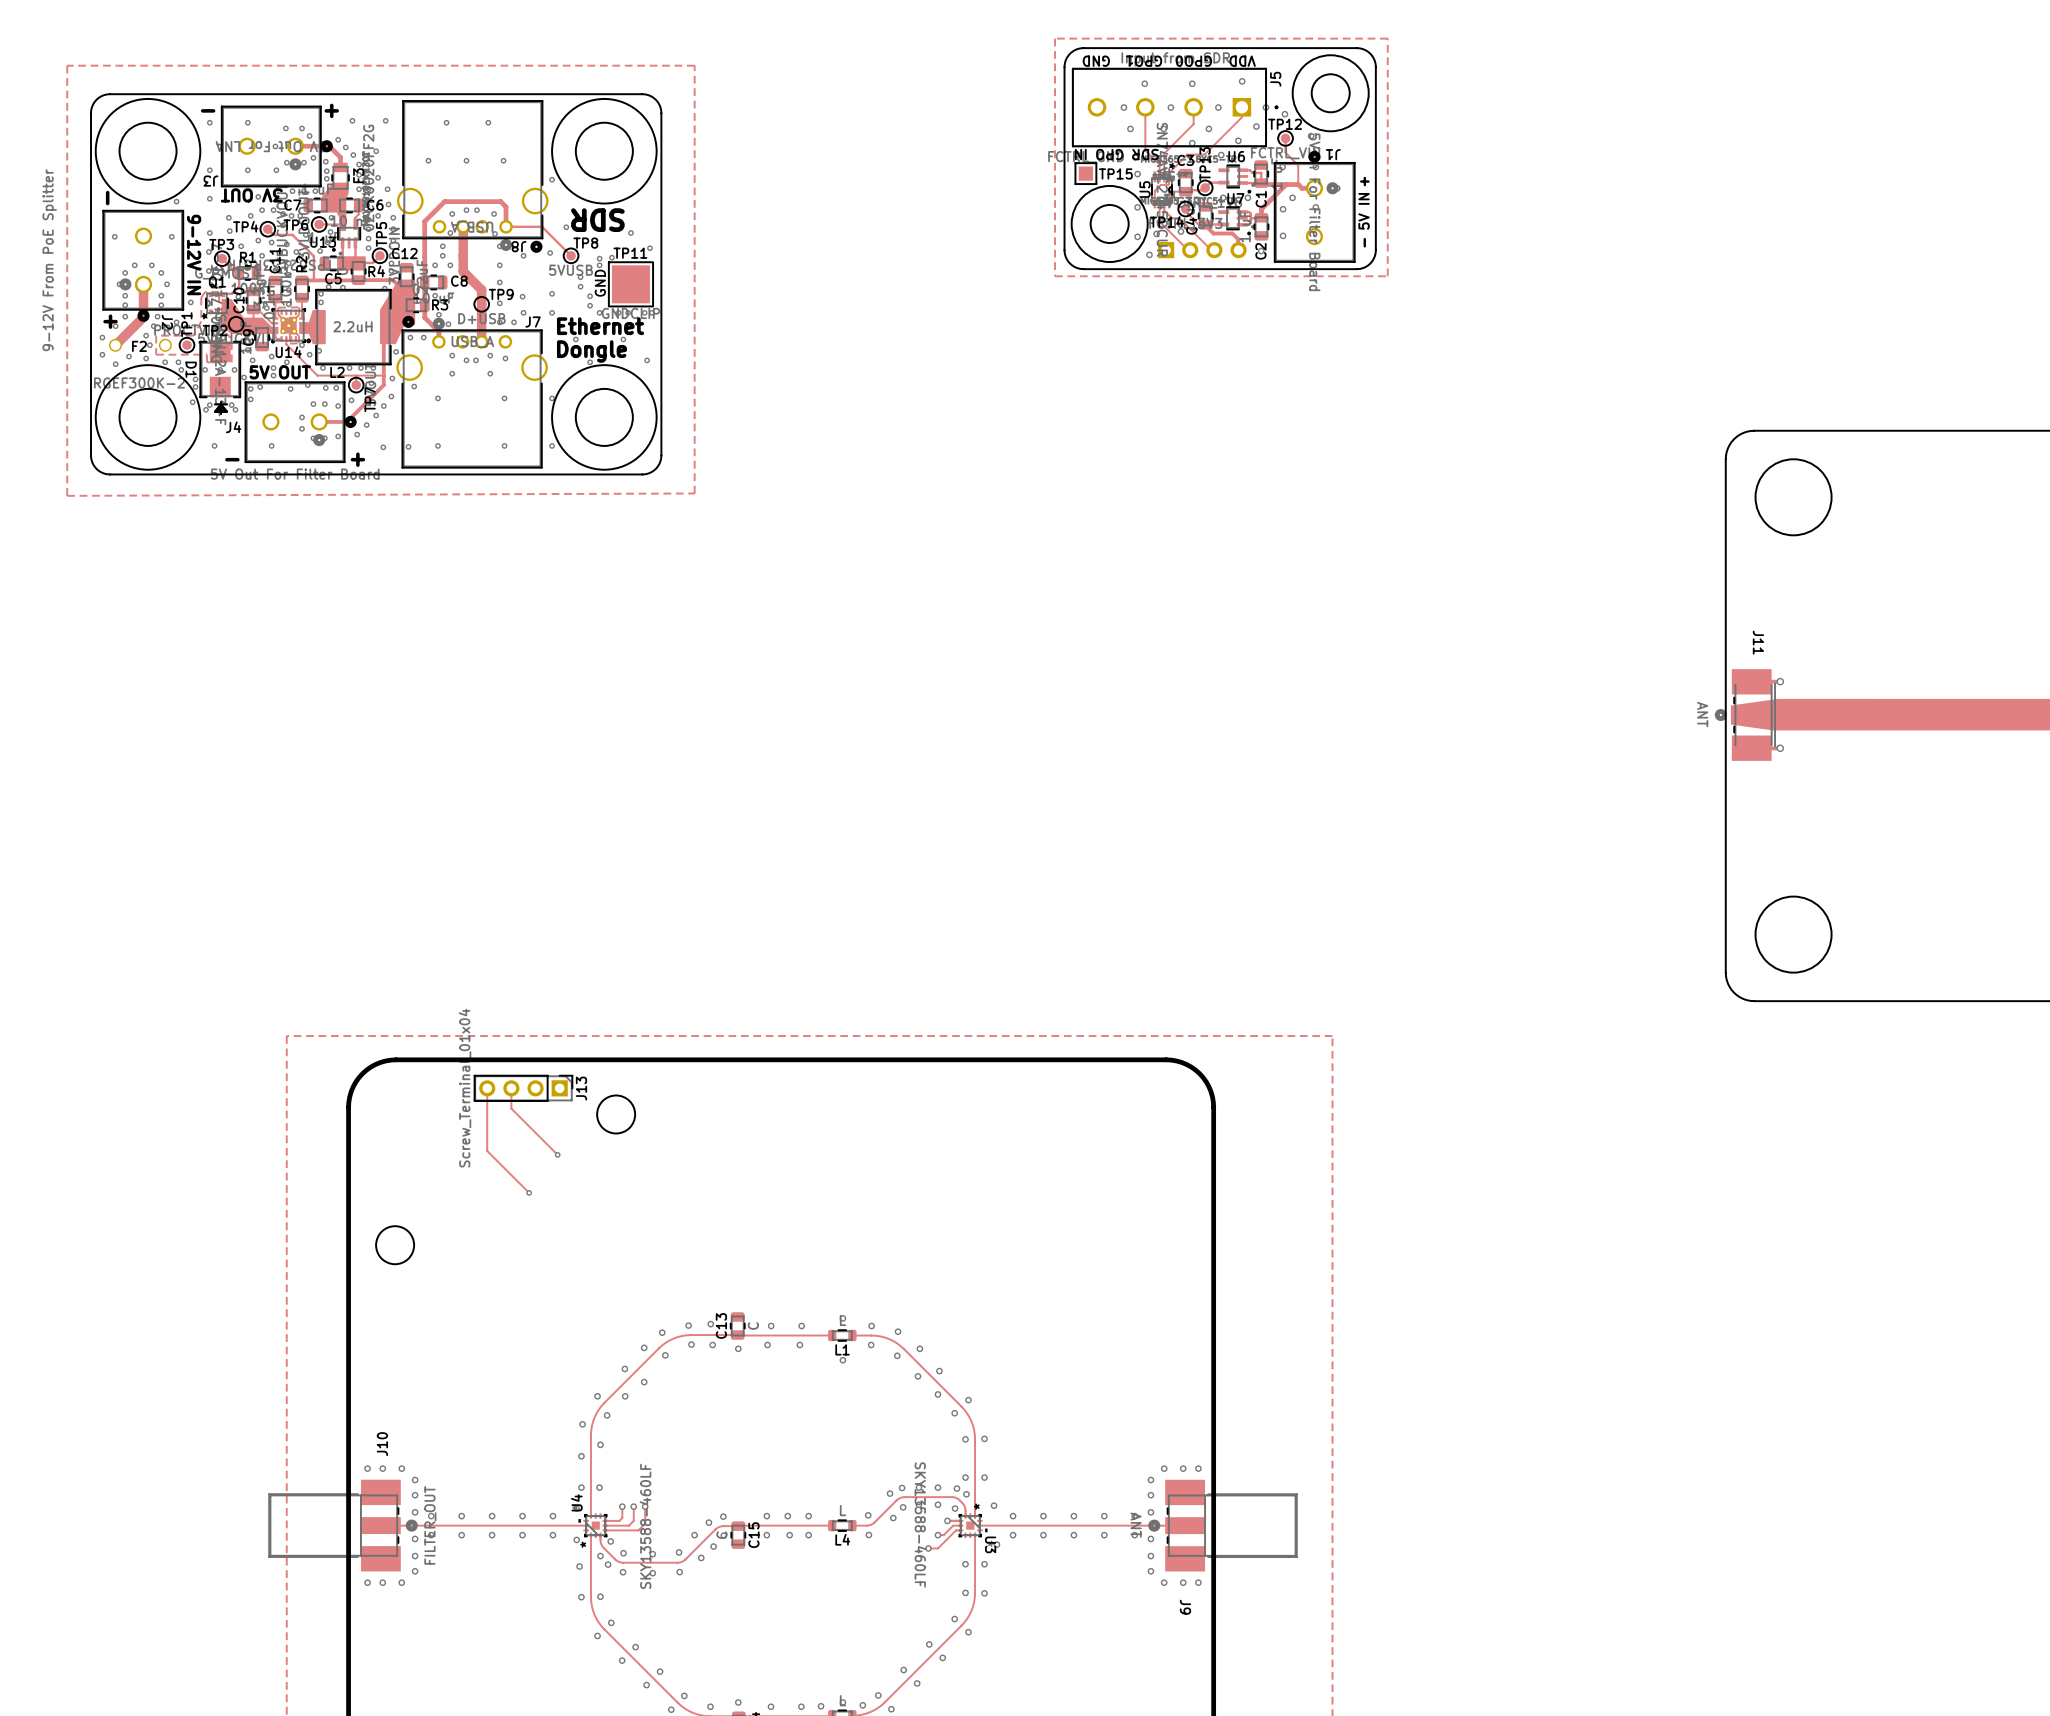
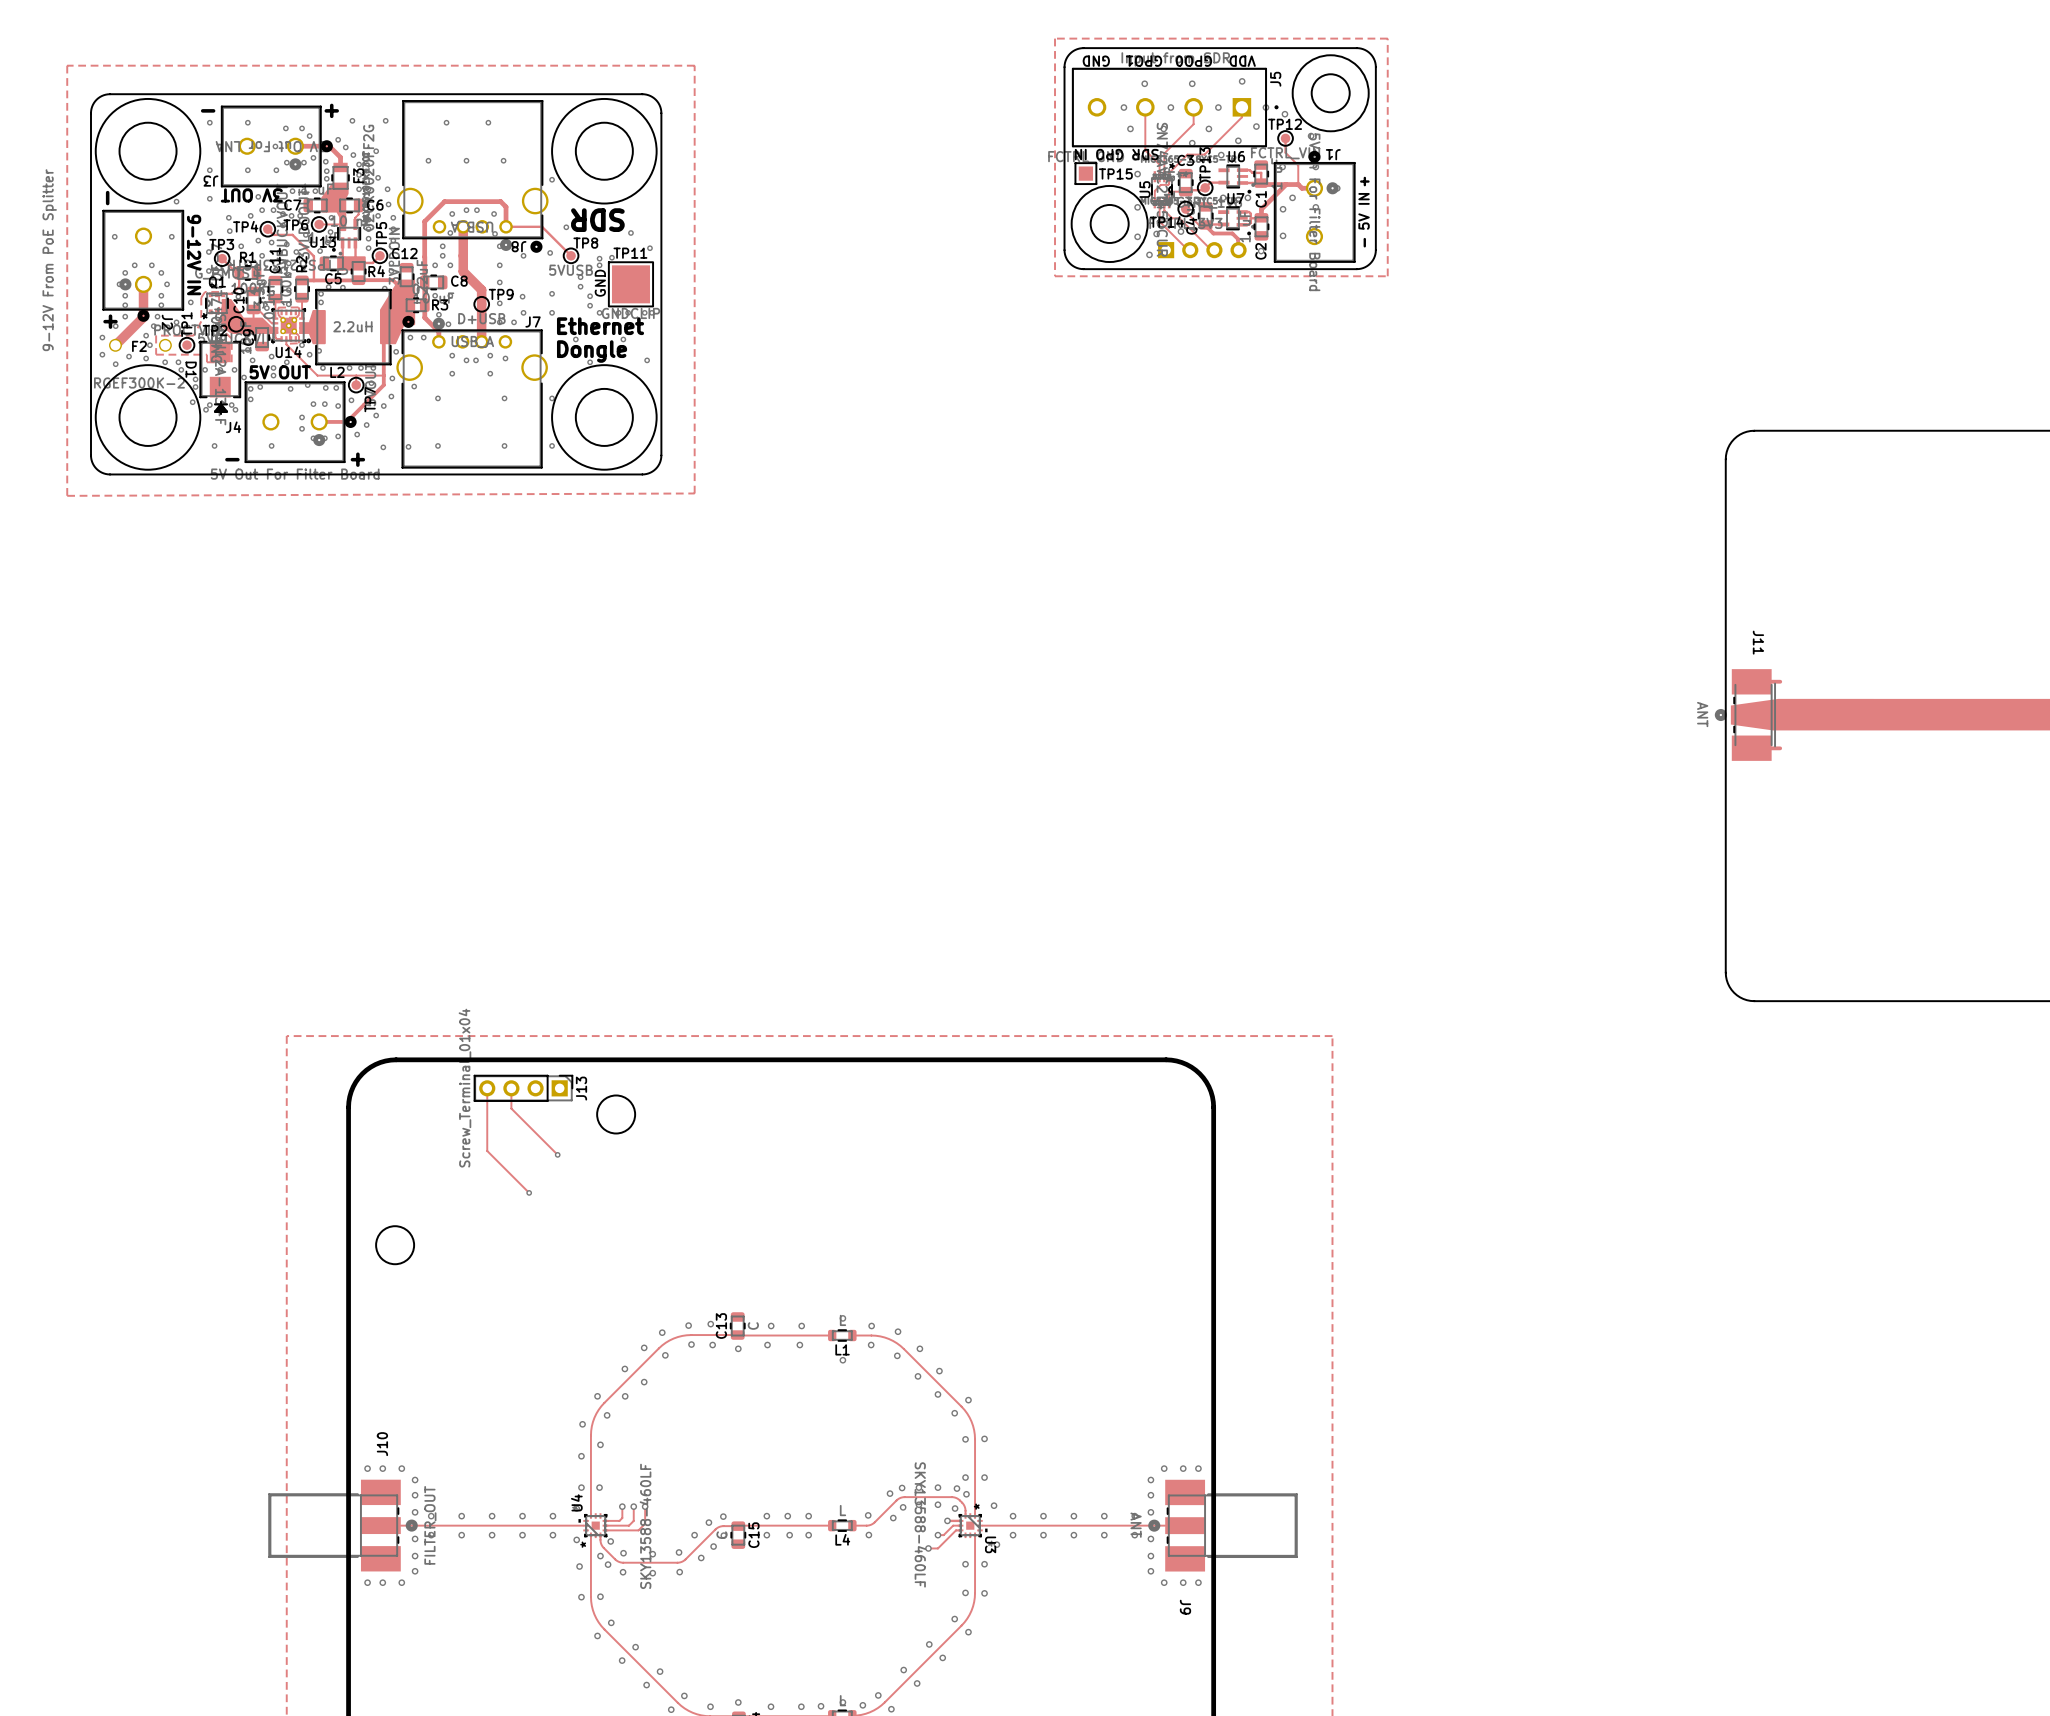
round board edge: [1754, 458, 1833, 537] -> none
via: (1780, 681) -> none
via: (1780, 748) -> none
round board edge: [1754, 895, 1833, 974] -> none

